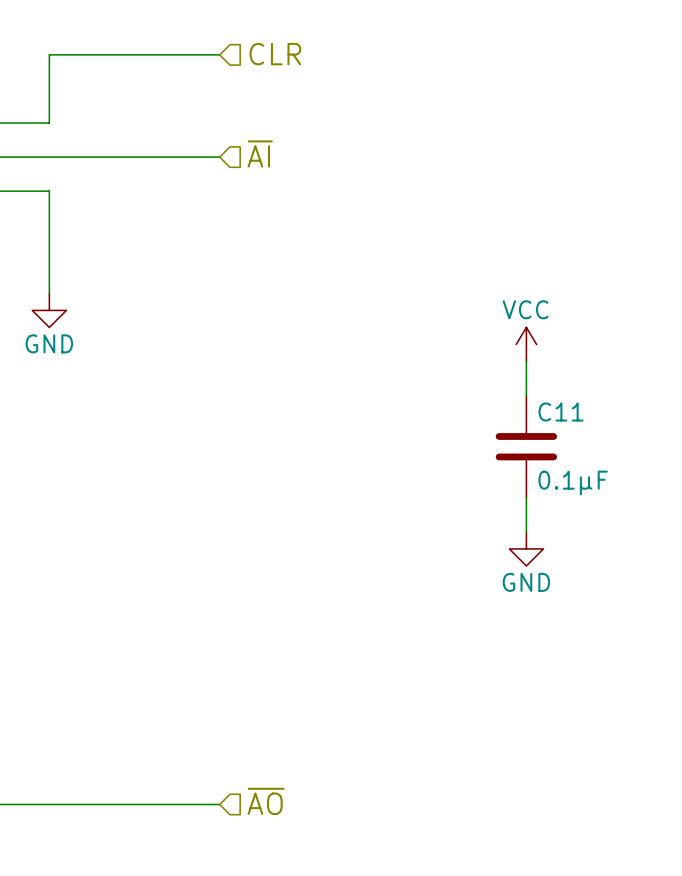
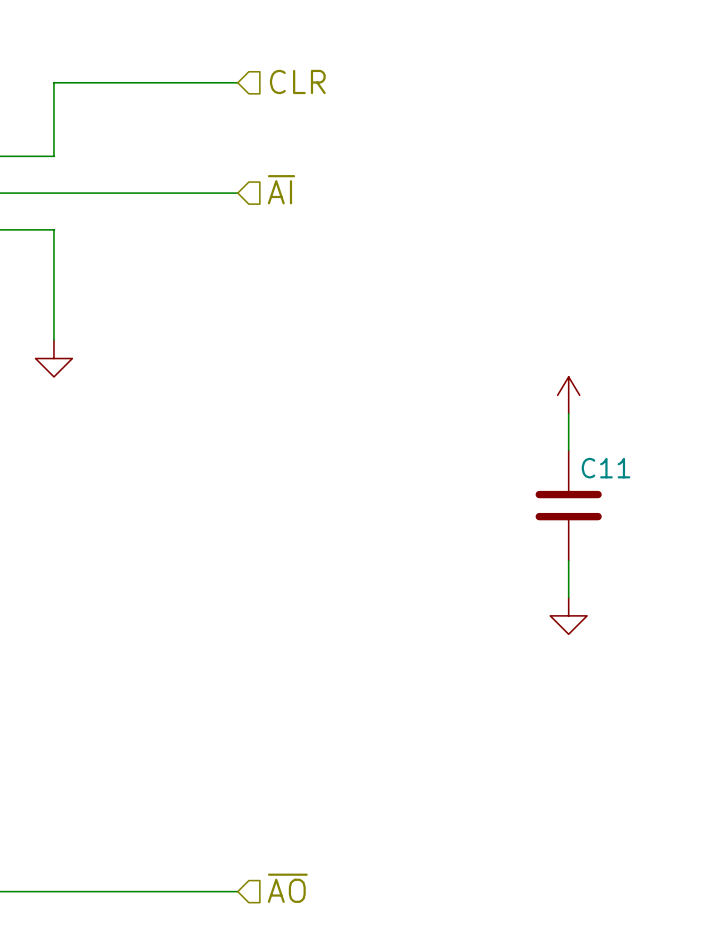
power symbol text: VCC (525, 309) -> none
power symbol text: GND (49, 343) -> none
C11 value: 0.1µF (573, 482) -> none
power symbol text: GND (526, 582) -> none

